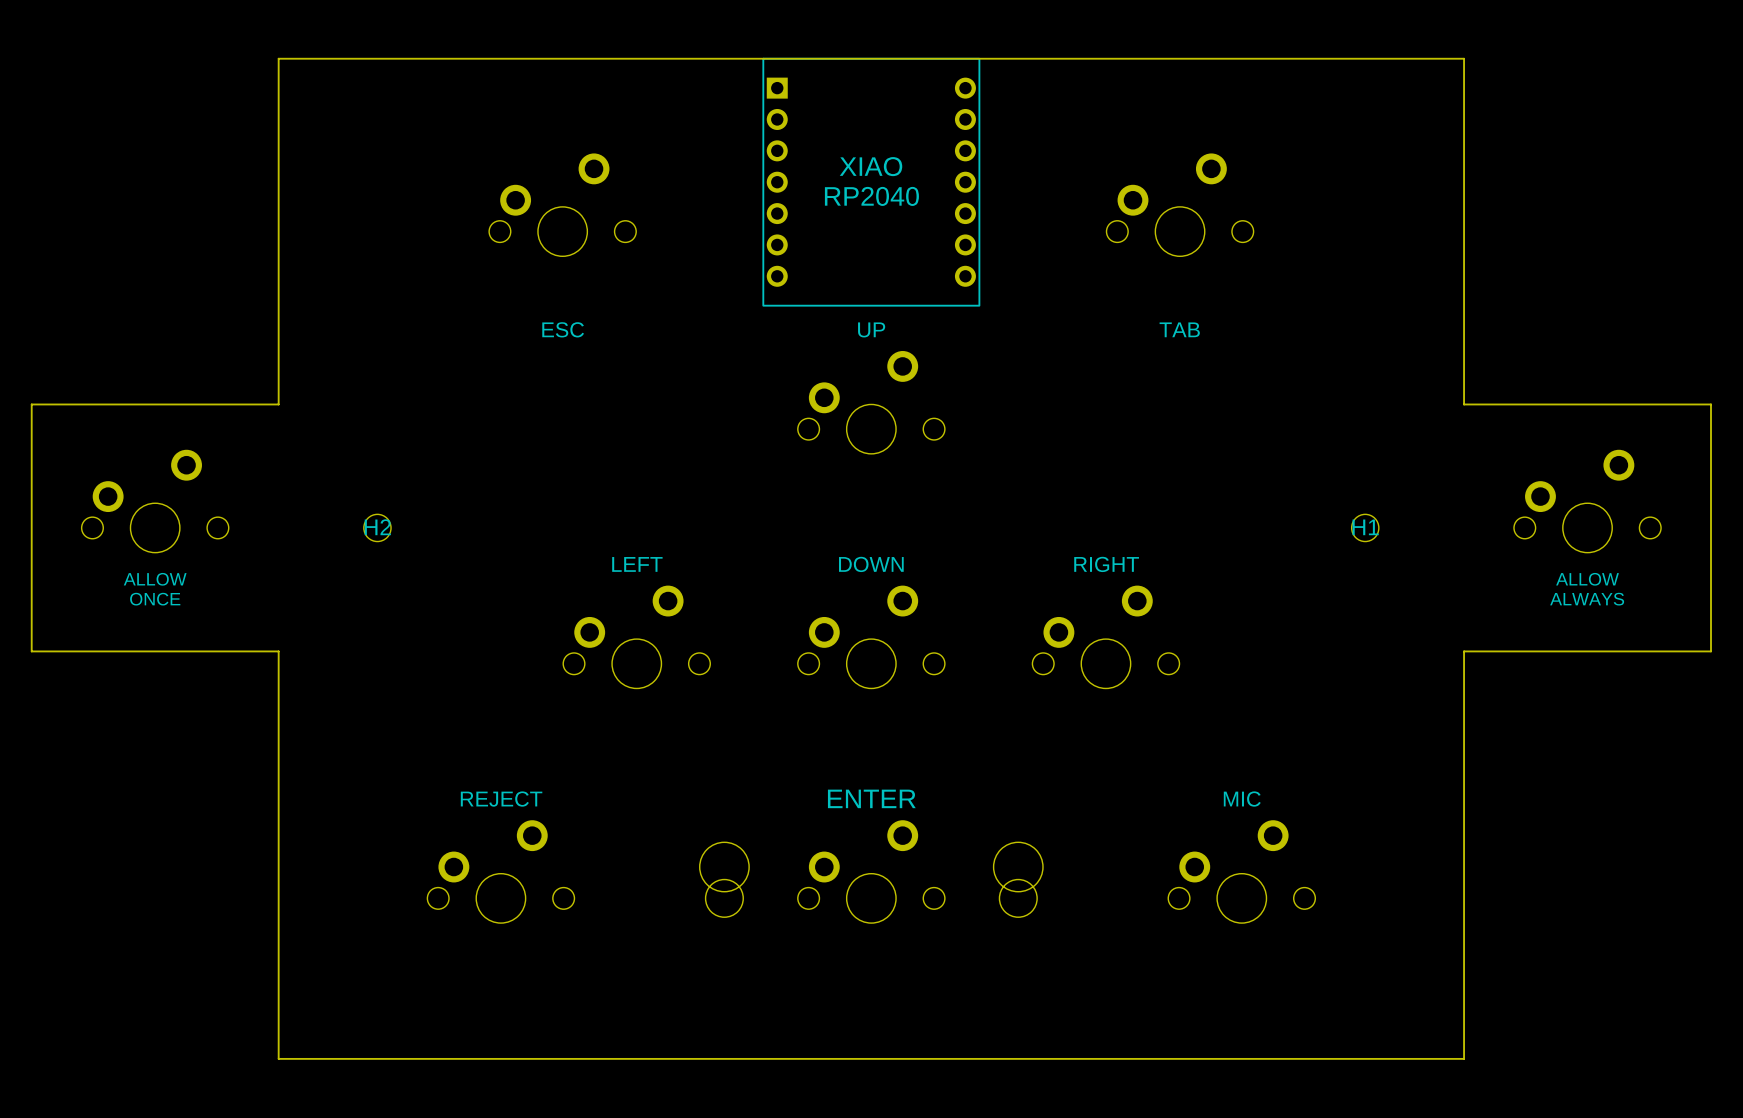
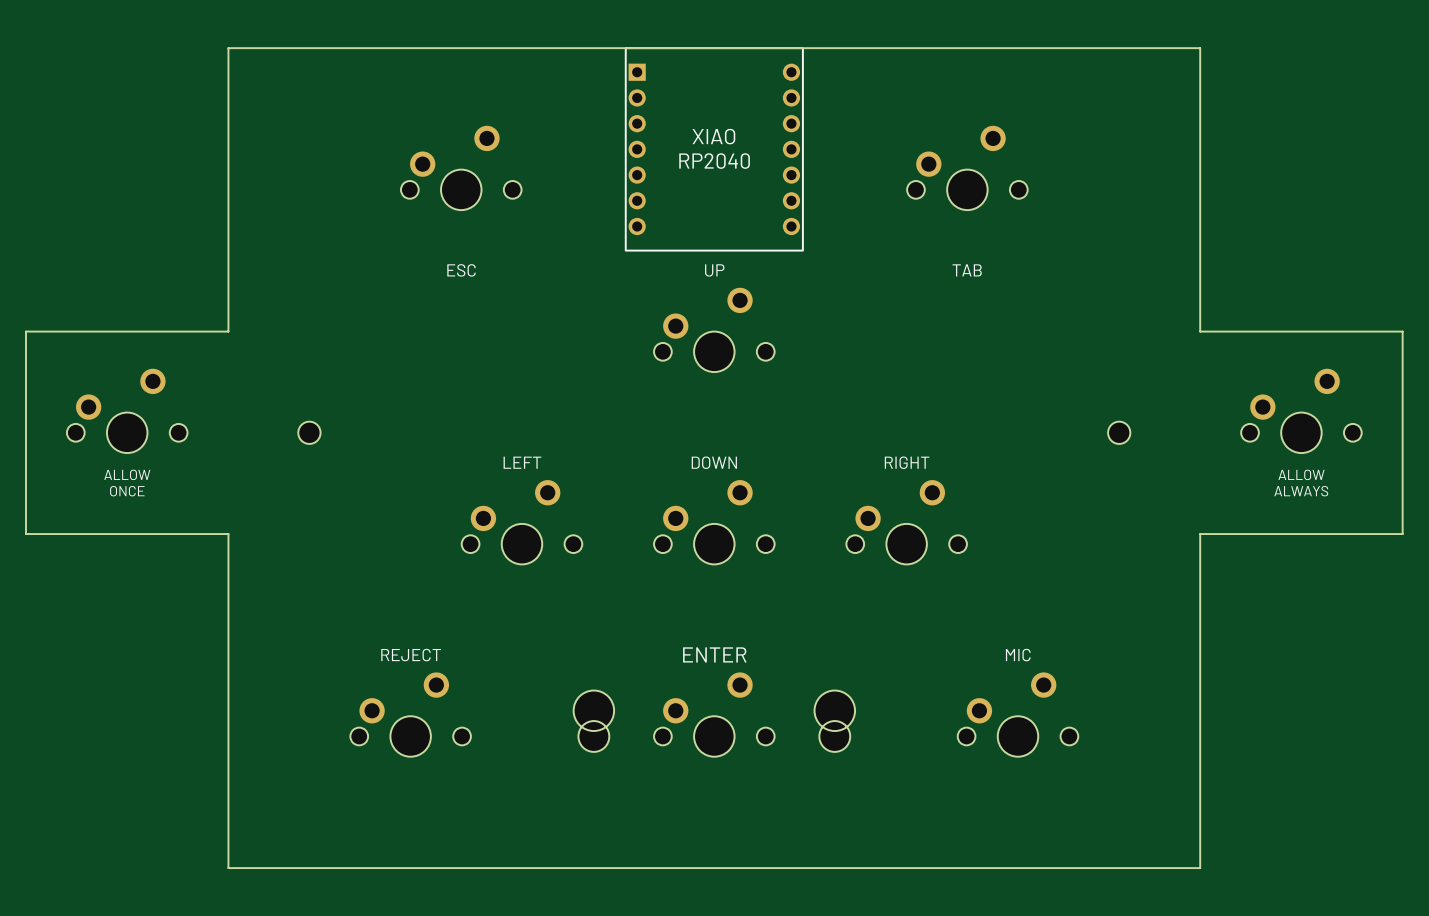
H2 name: H2 (377, 527) -> none
H1 name: H1 (1365, 527) -> none

